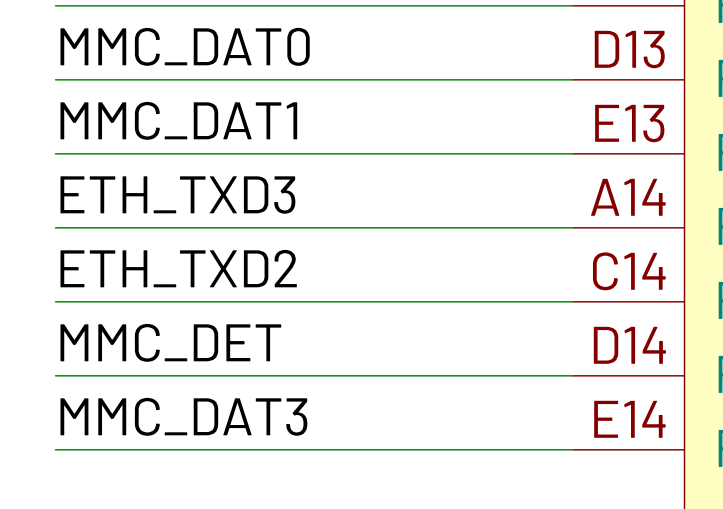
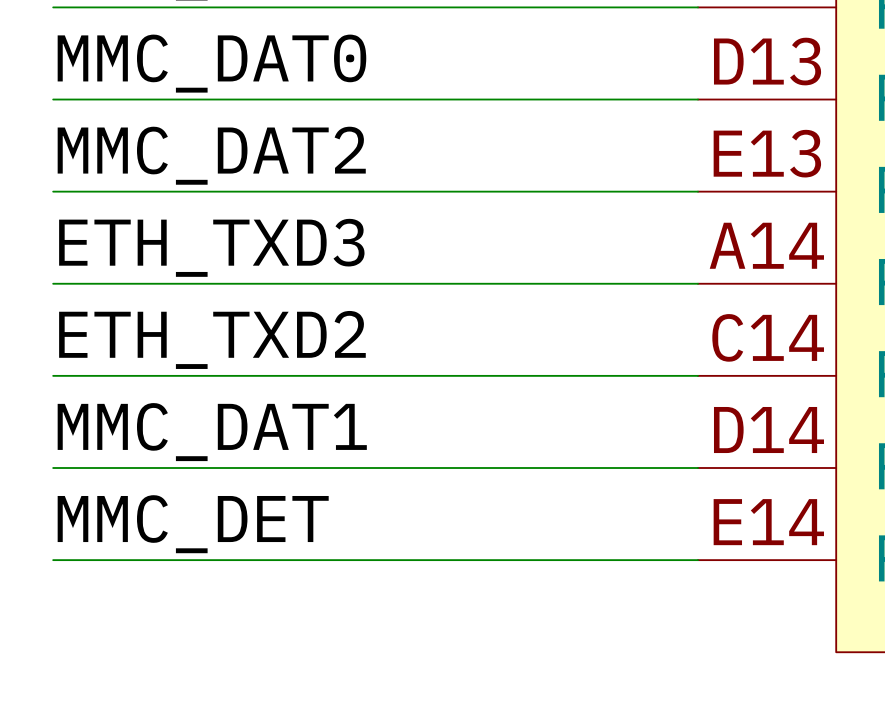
label: MMC_DAT1 (178, 120) -> MMC_DAT2 (211, 155)
label: MMC_DET (170, 342) -> MMC_DAT1 (212, 432)
label: MMC_DAT3 (183, 416) -> MMC_DET (193, 524)

